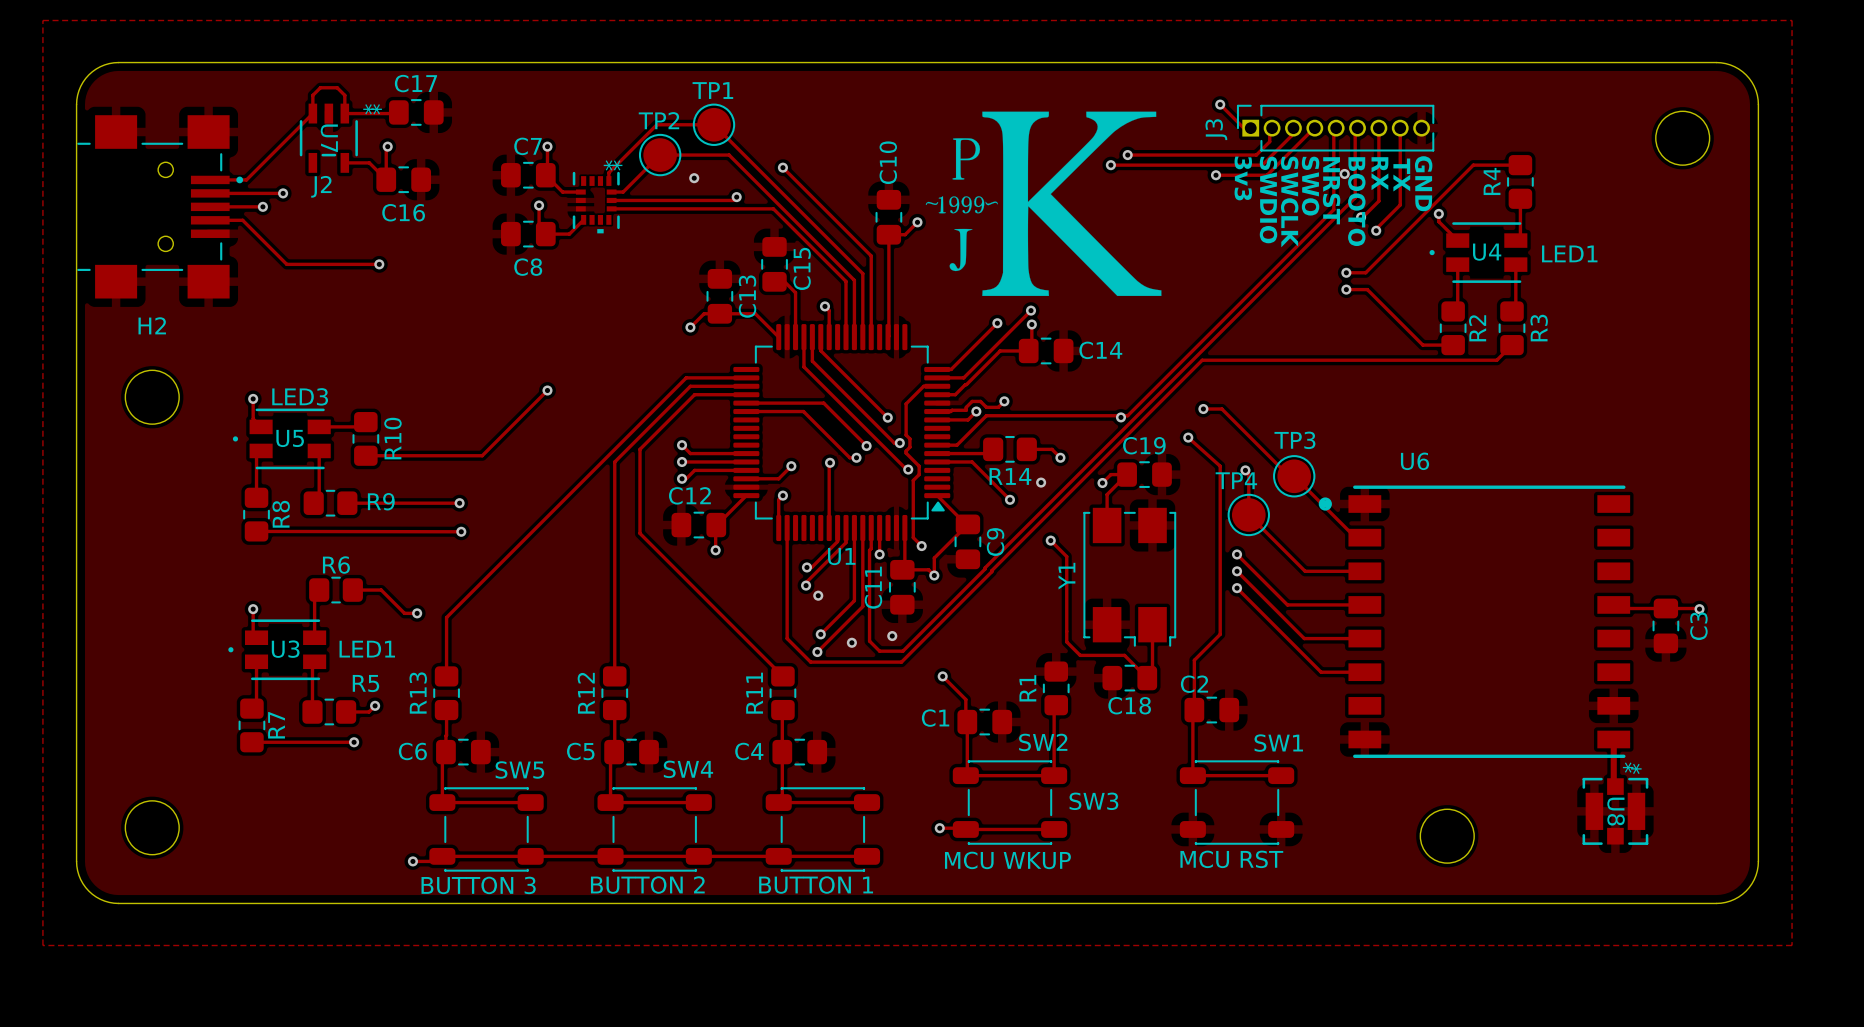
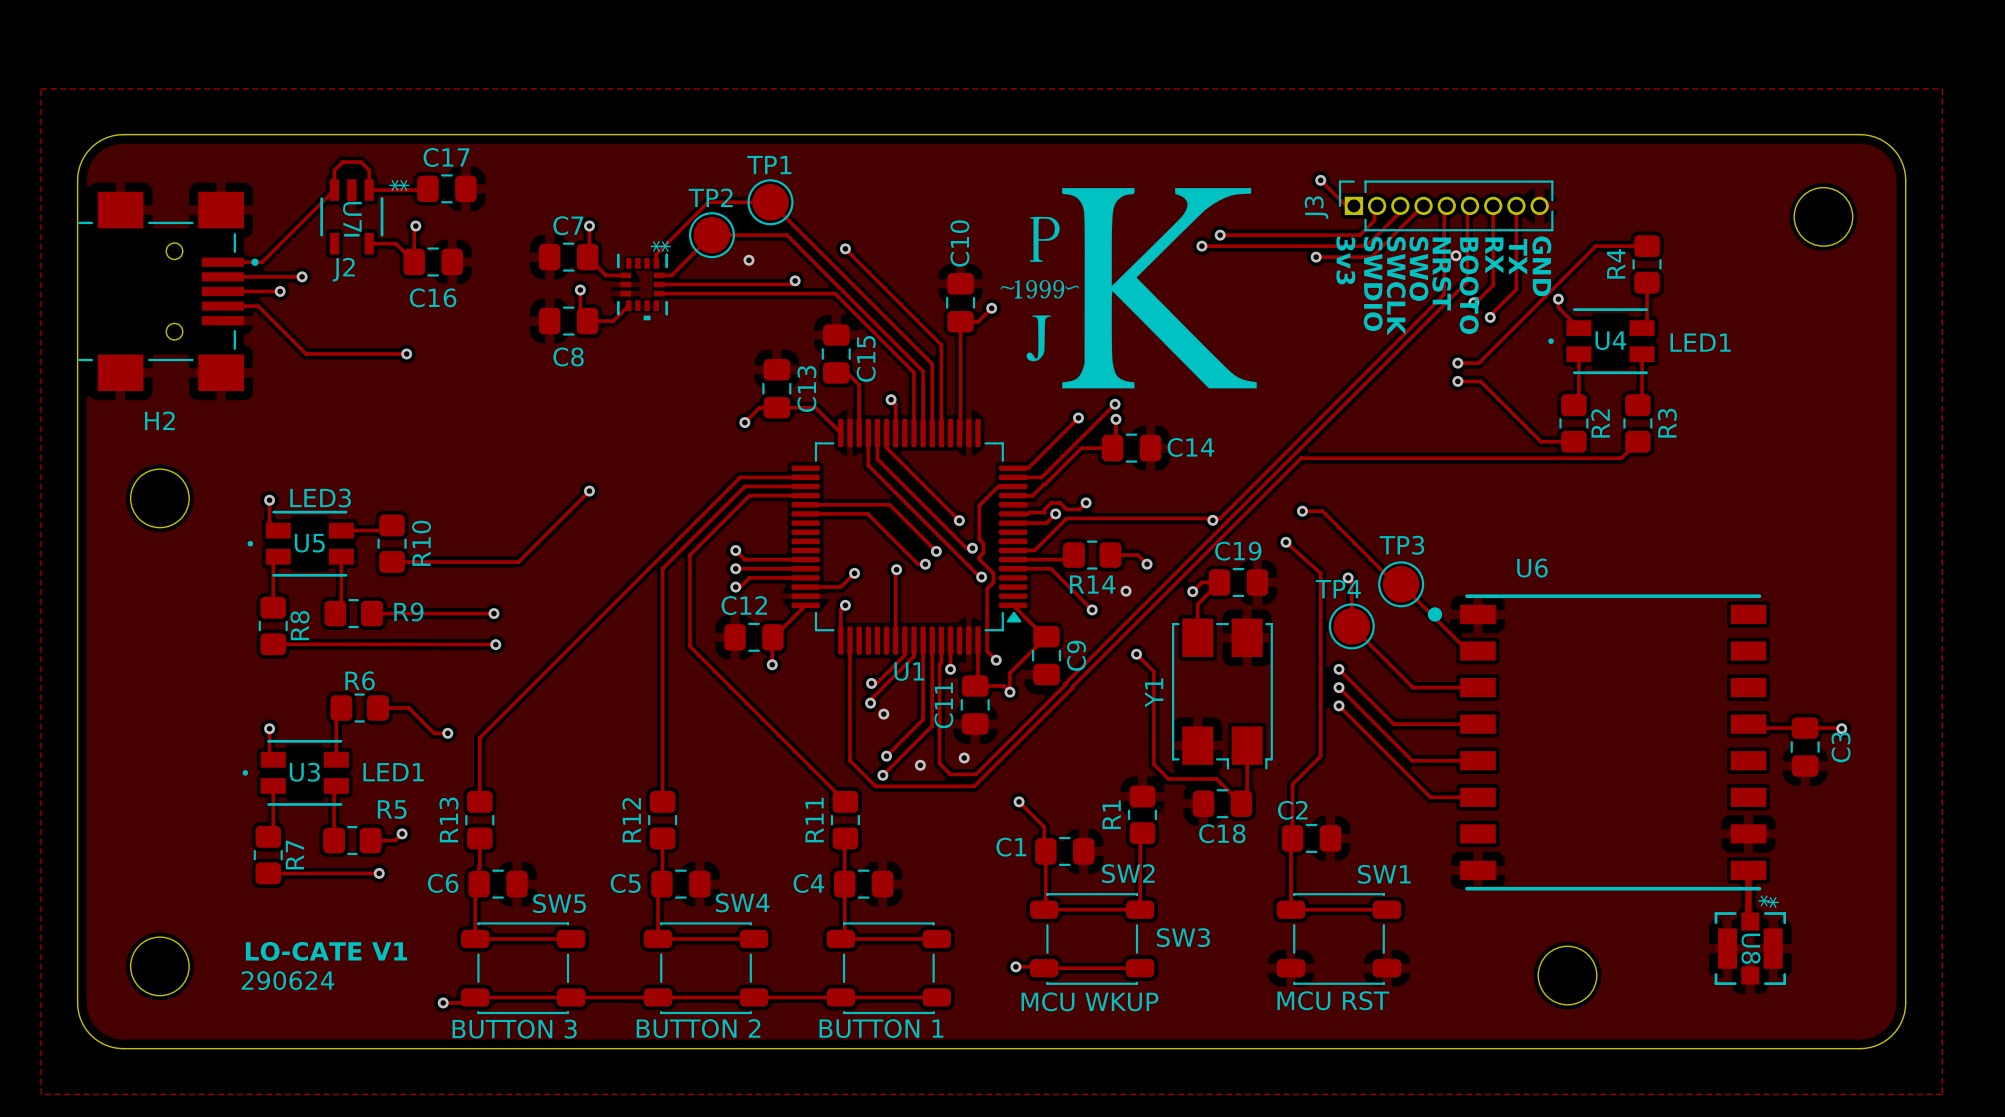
text: none -> LO-CATE V1 (326, 951)
text: none -> 290624 (287, 980)

